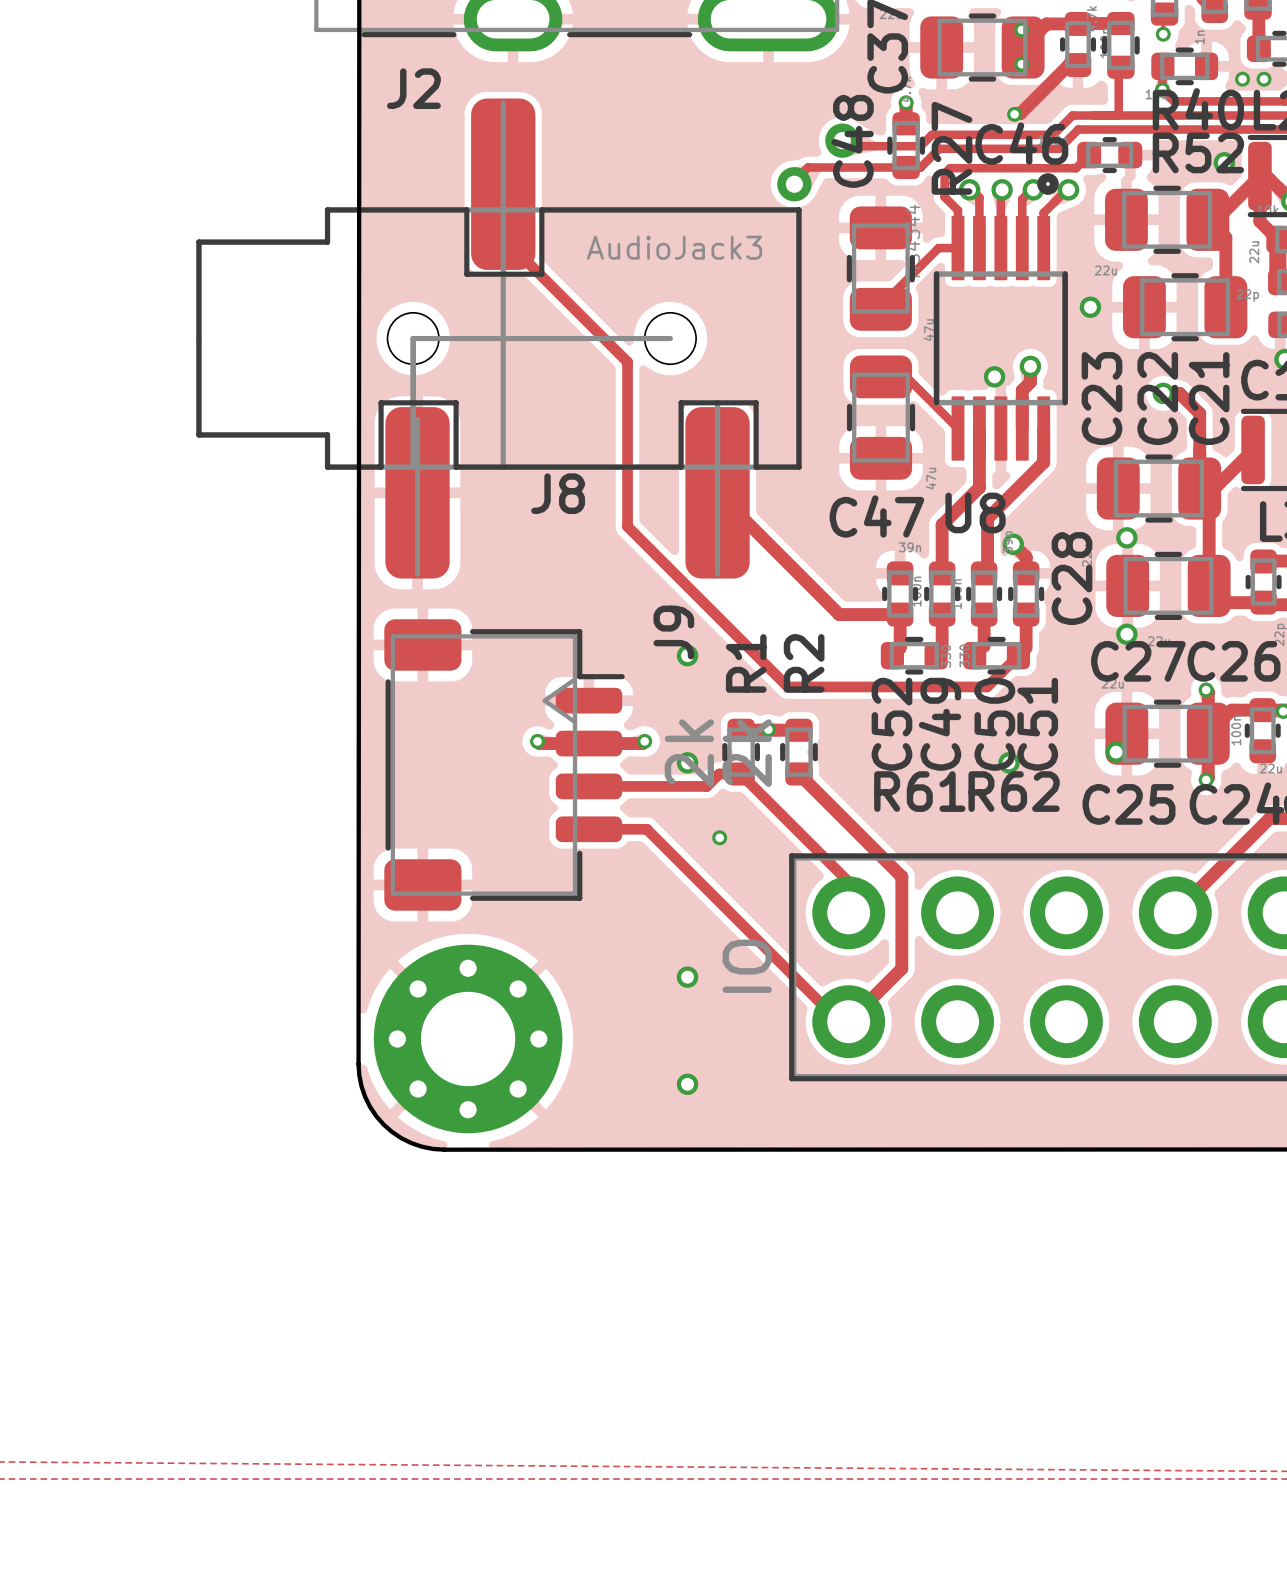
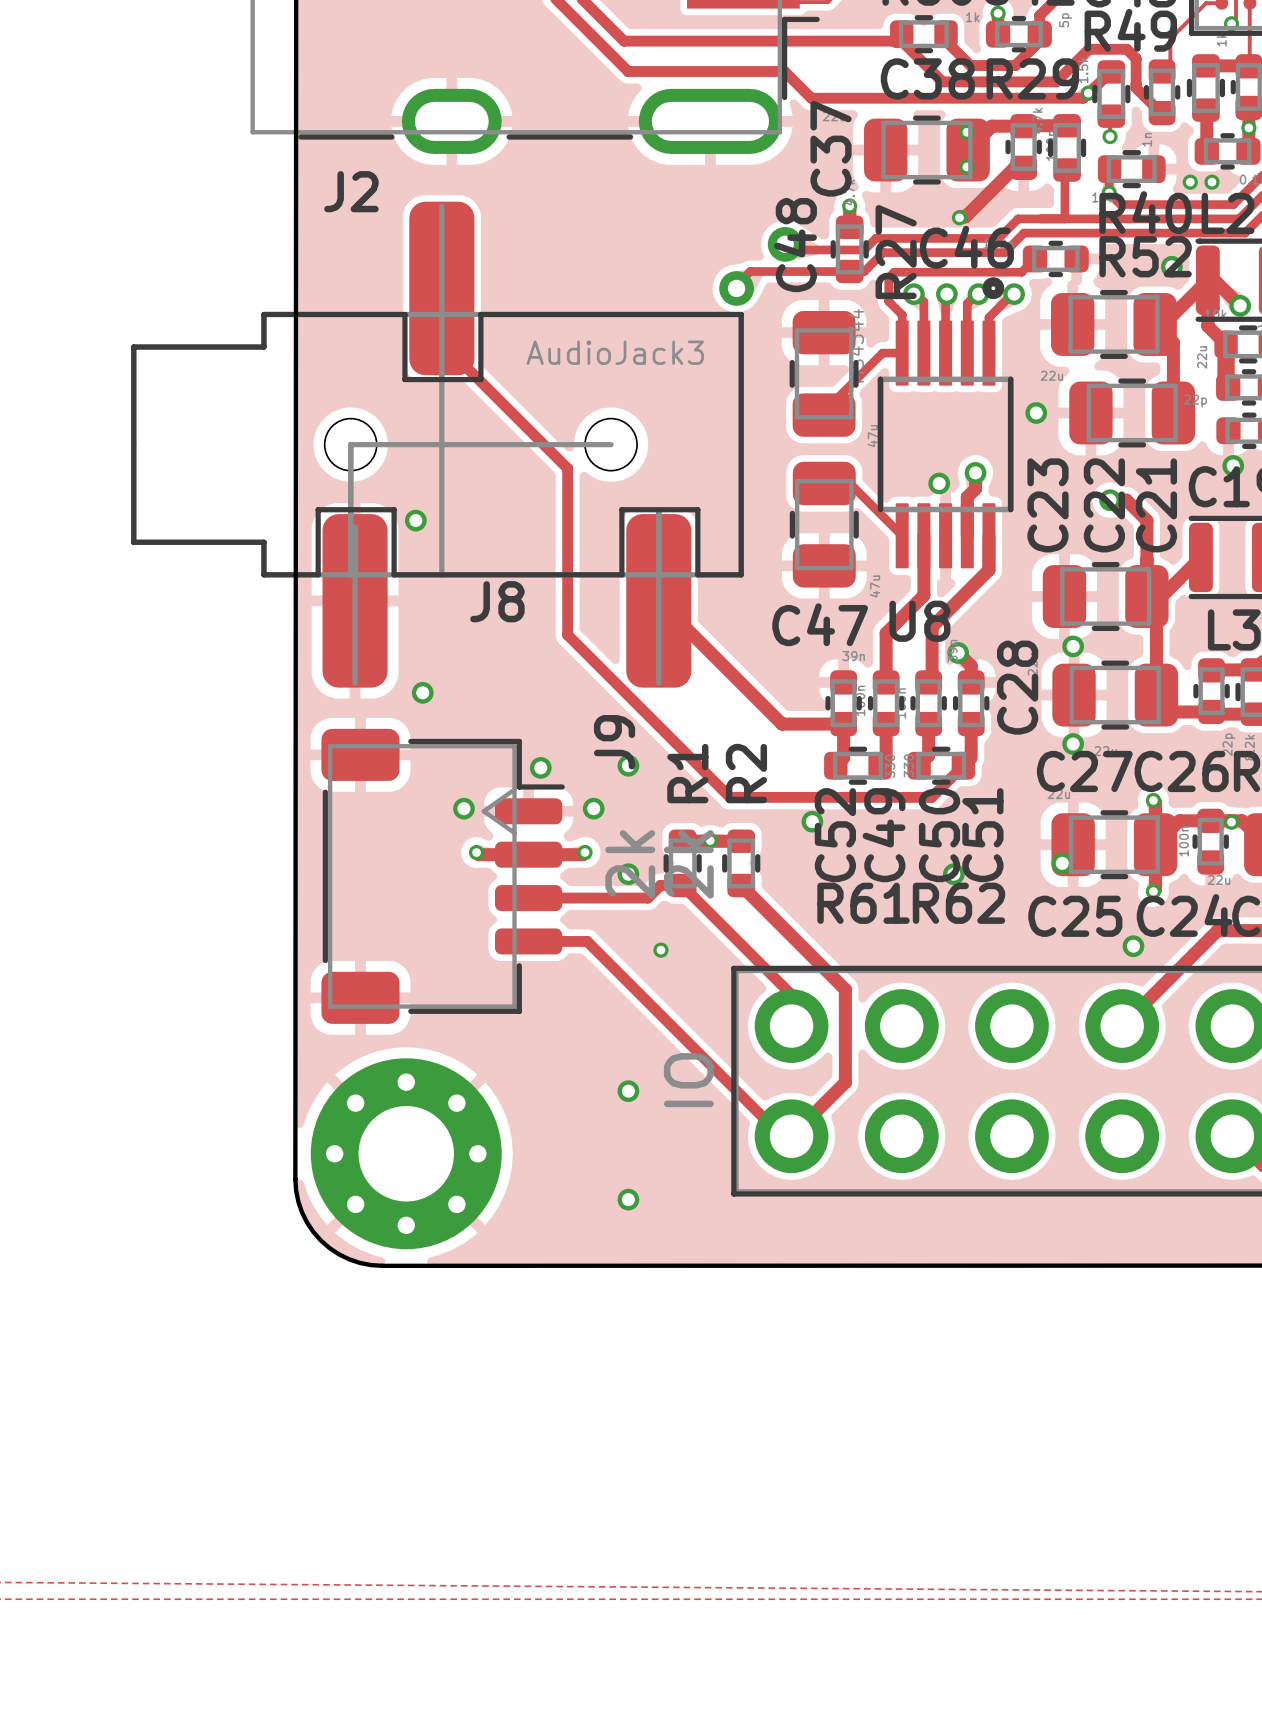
via: none -> (415, 520)
via: none -> (422, 692)
via: none -> (540, 767)
via: none -> (463, 808)
via: none -> (593, 808)
via: none -> (812, 821)
via: none -> (1133, 946)

